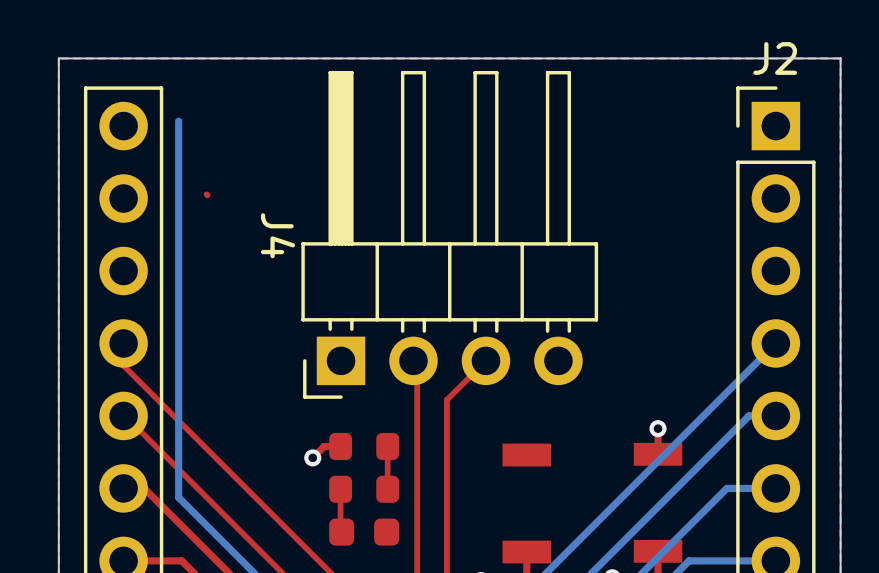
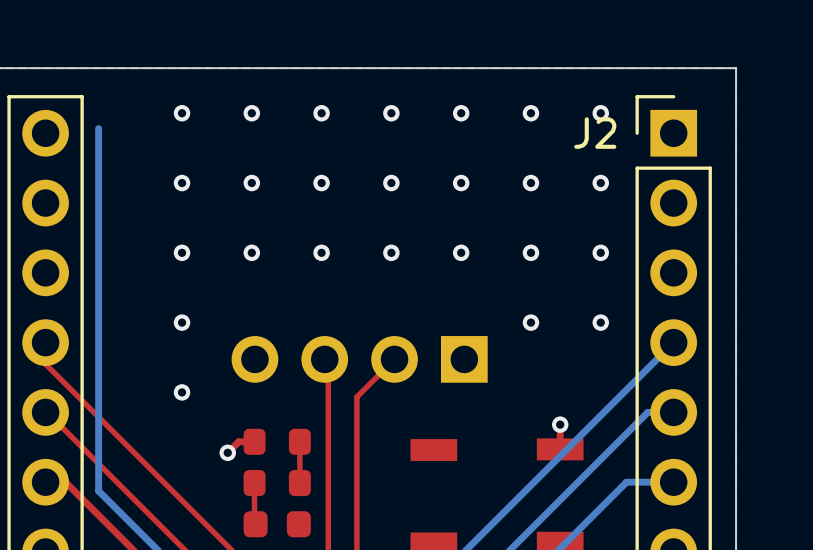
J2 name position: J2 (775, 58) -> J2 (595, 133)
via: none -> (182, 113)
via: none -> (251, 113)
via: none -> (321, 113)
via: none -> (391, 113)
via: none -> (461, 113)
via: none -> (530, 113)
via: none -> (600, 113)
via: none -> (182, 183)
via: none -> (251, 183)
via: none -> (321, 183)
via: none -> (391, 183)
via: none -> (461, 183)
via: none -> (530, 183)
via: none -> (600, 183)
top track: (206, 194) (207, 195) -> none
J4 side: bottom (449, 234) -> top (359, 359)
via: none -> (182, 252)
via: none -> (251, 252)
via: none -> (321, 252)
via: none -> (391, 252)
via: none -> (461, 252)
via: none -> (530, 252)
via: none -> (600, 252)
via: none -> (182, 322)
via: none -> (530, 322)
via: none -> (600, 322)
via: none -> (182, 392)

